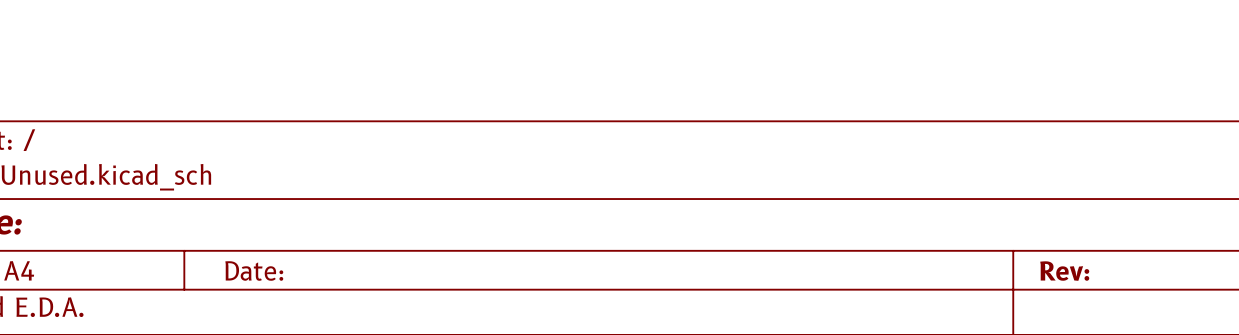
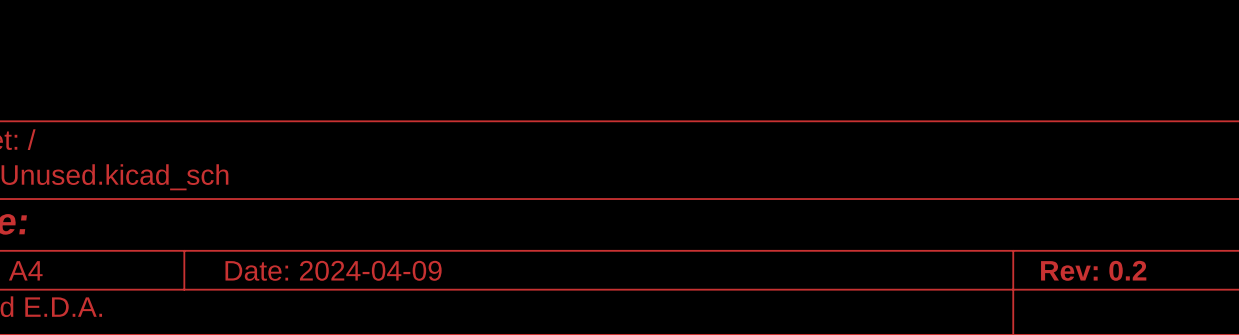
title block: Date: (254, 270) -> Date: 2024-04-09 (333, 270)
title block: Rev: (1064, 271) -> Rev: 0.2 (1093, 270)

